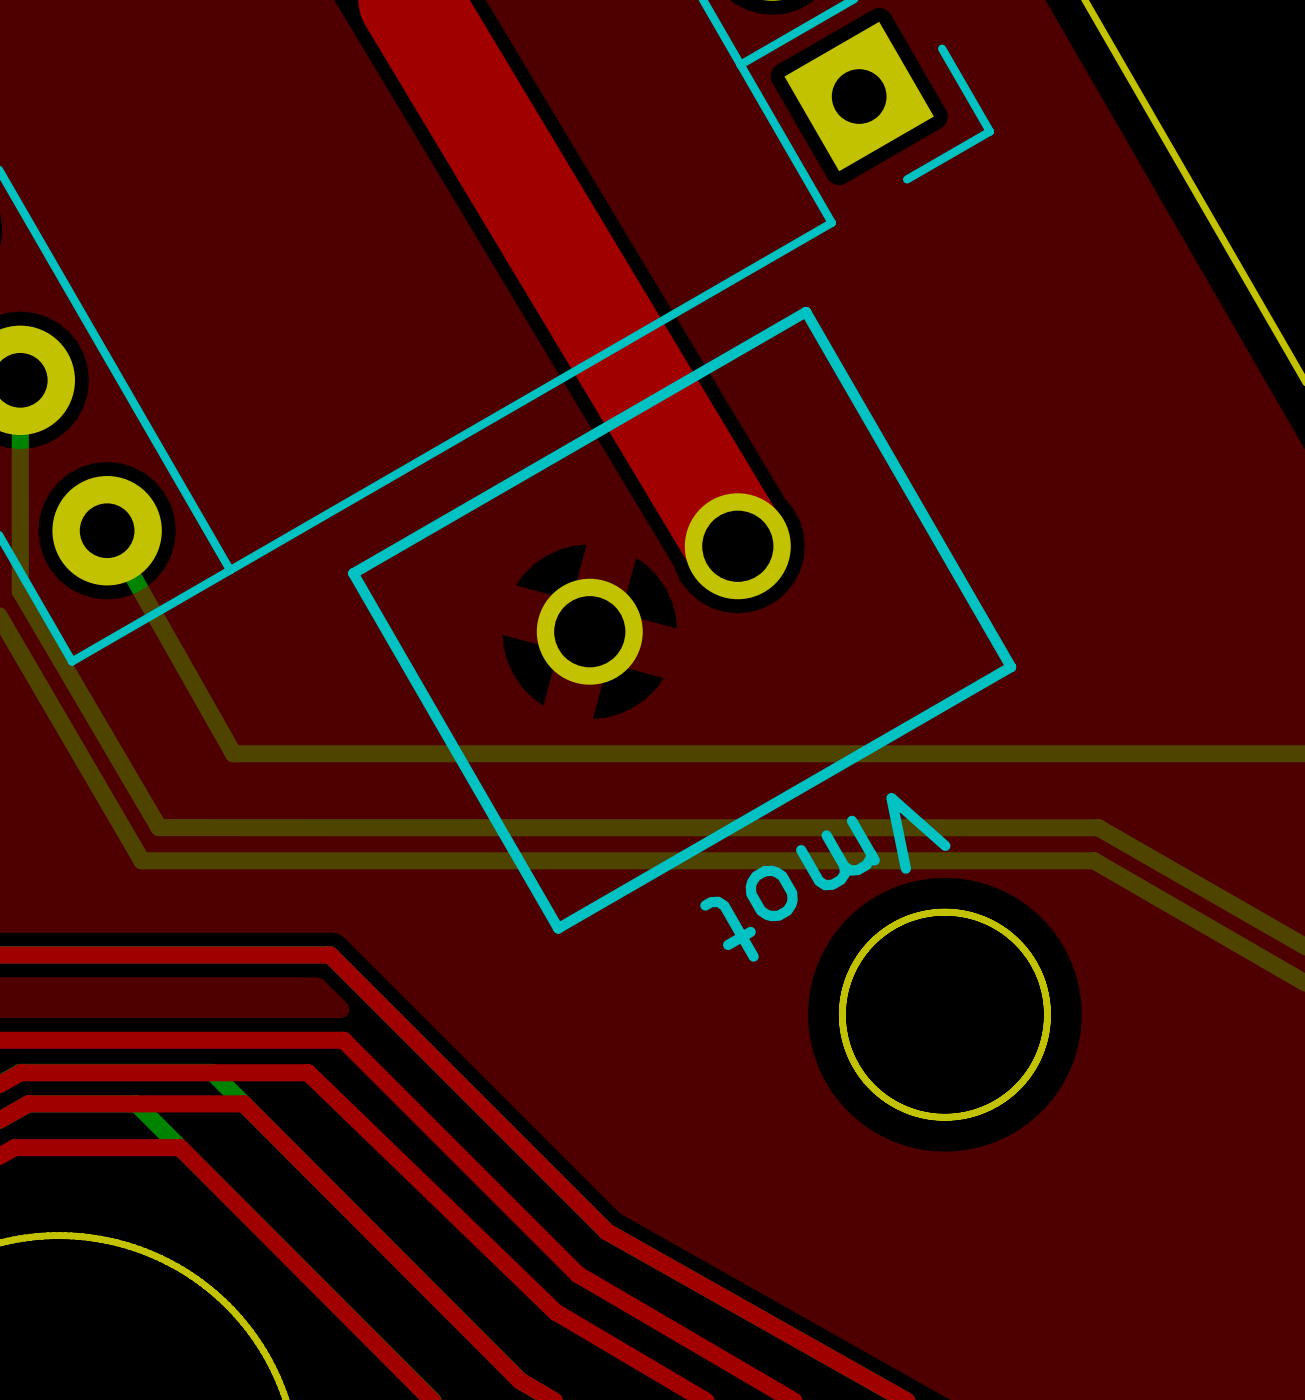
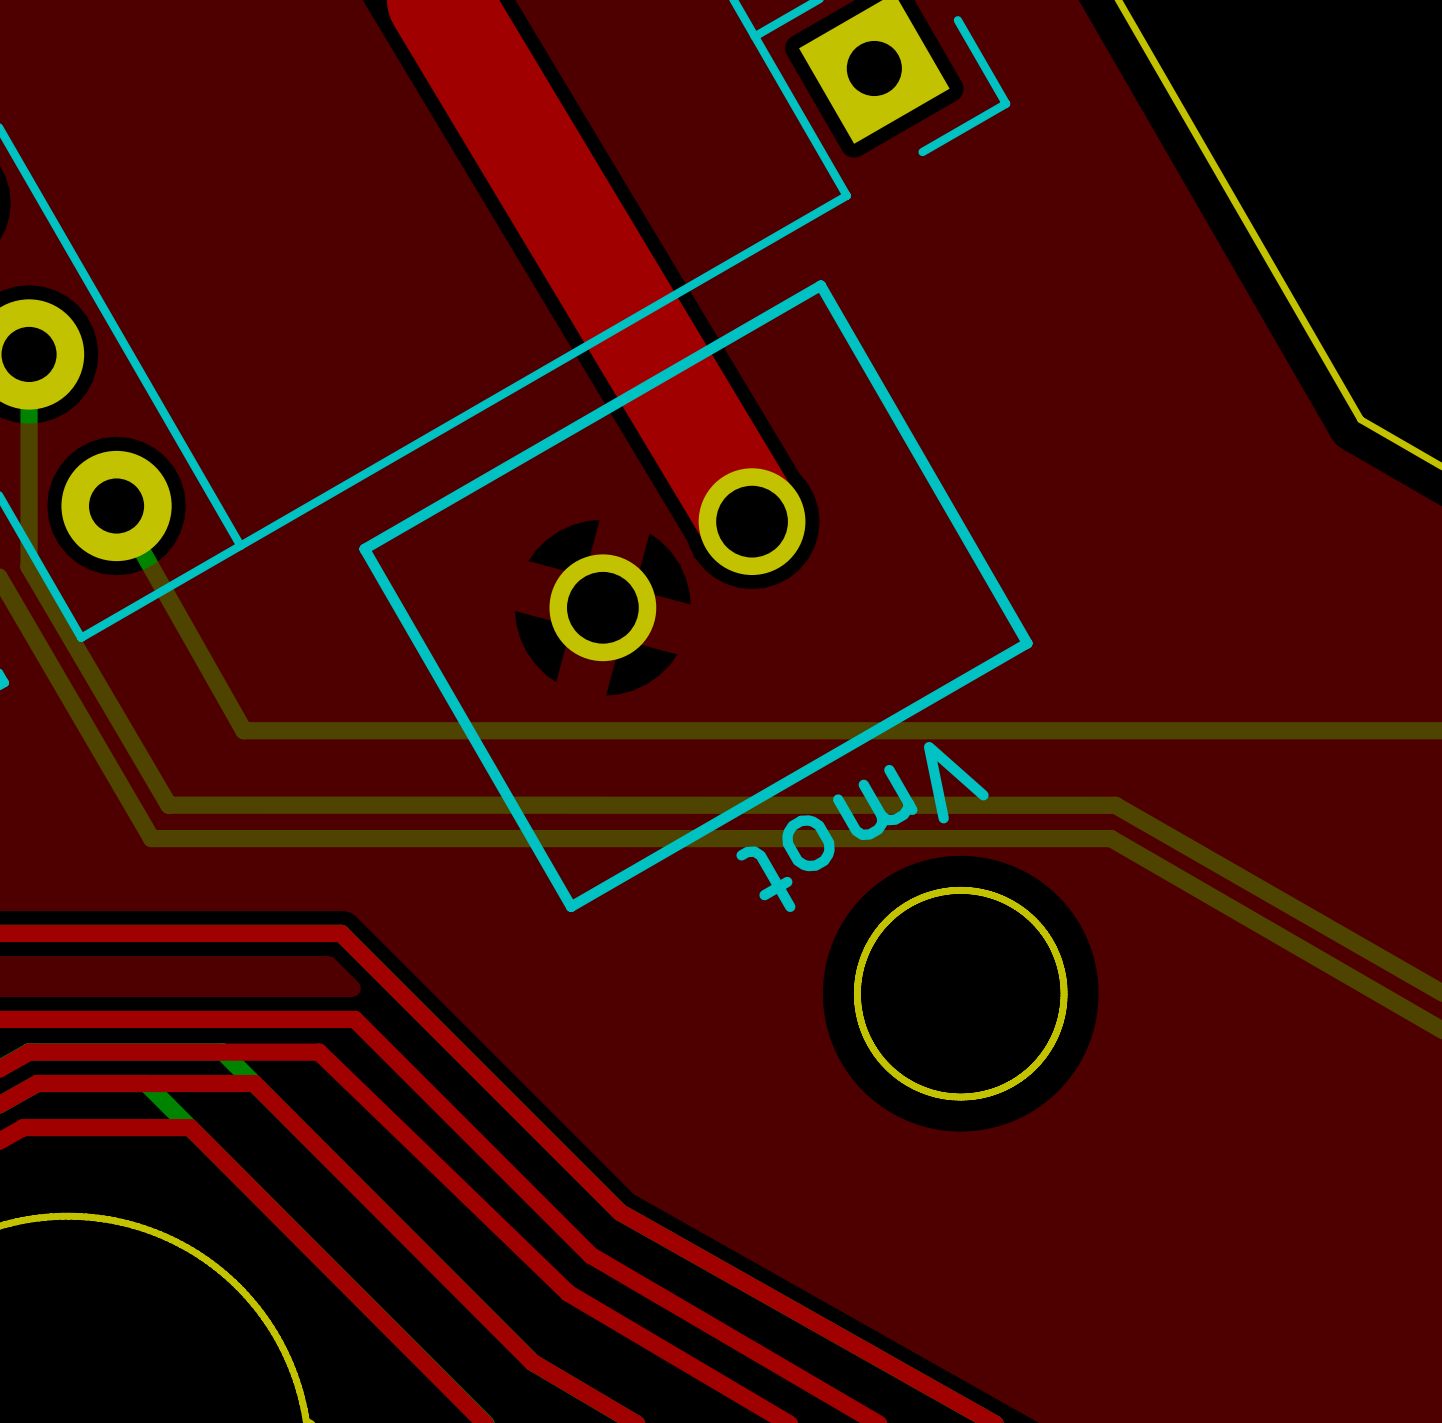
part value position: Vmot (825, 877) -> Vmot (862, 826)

